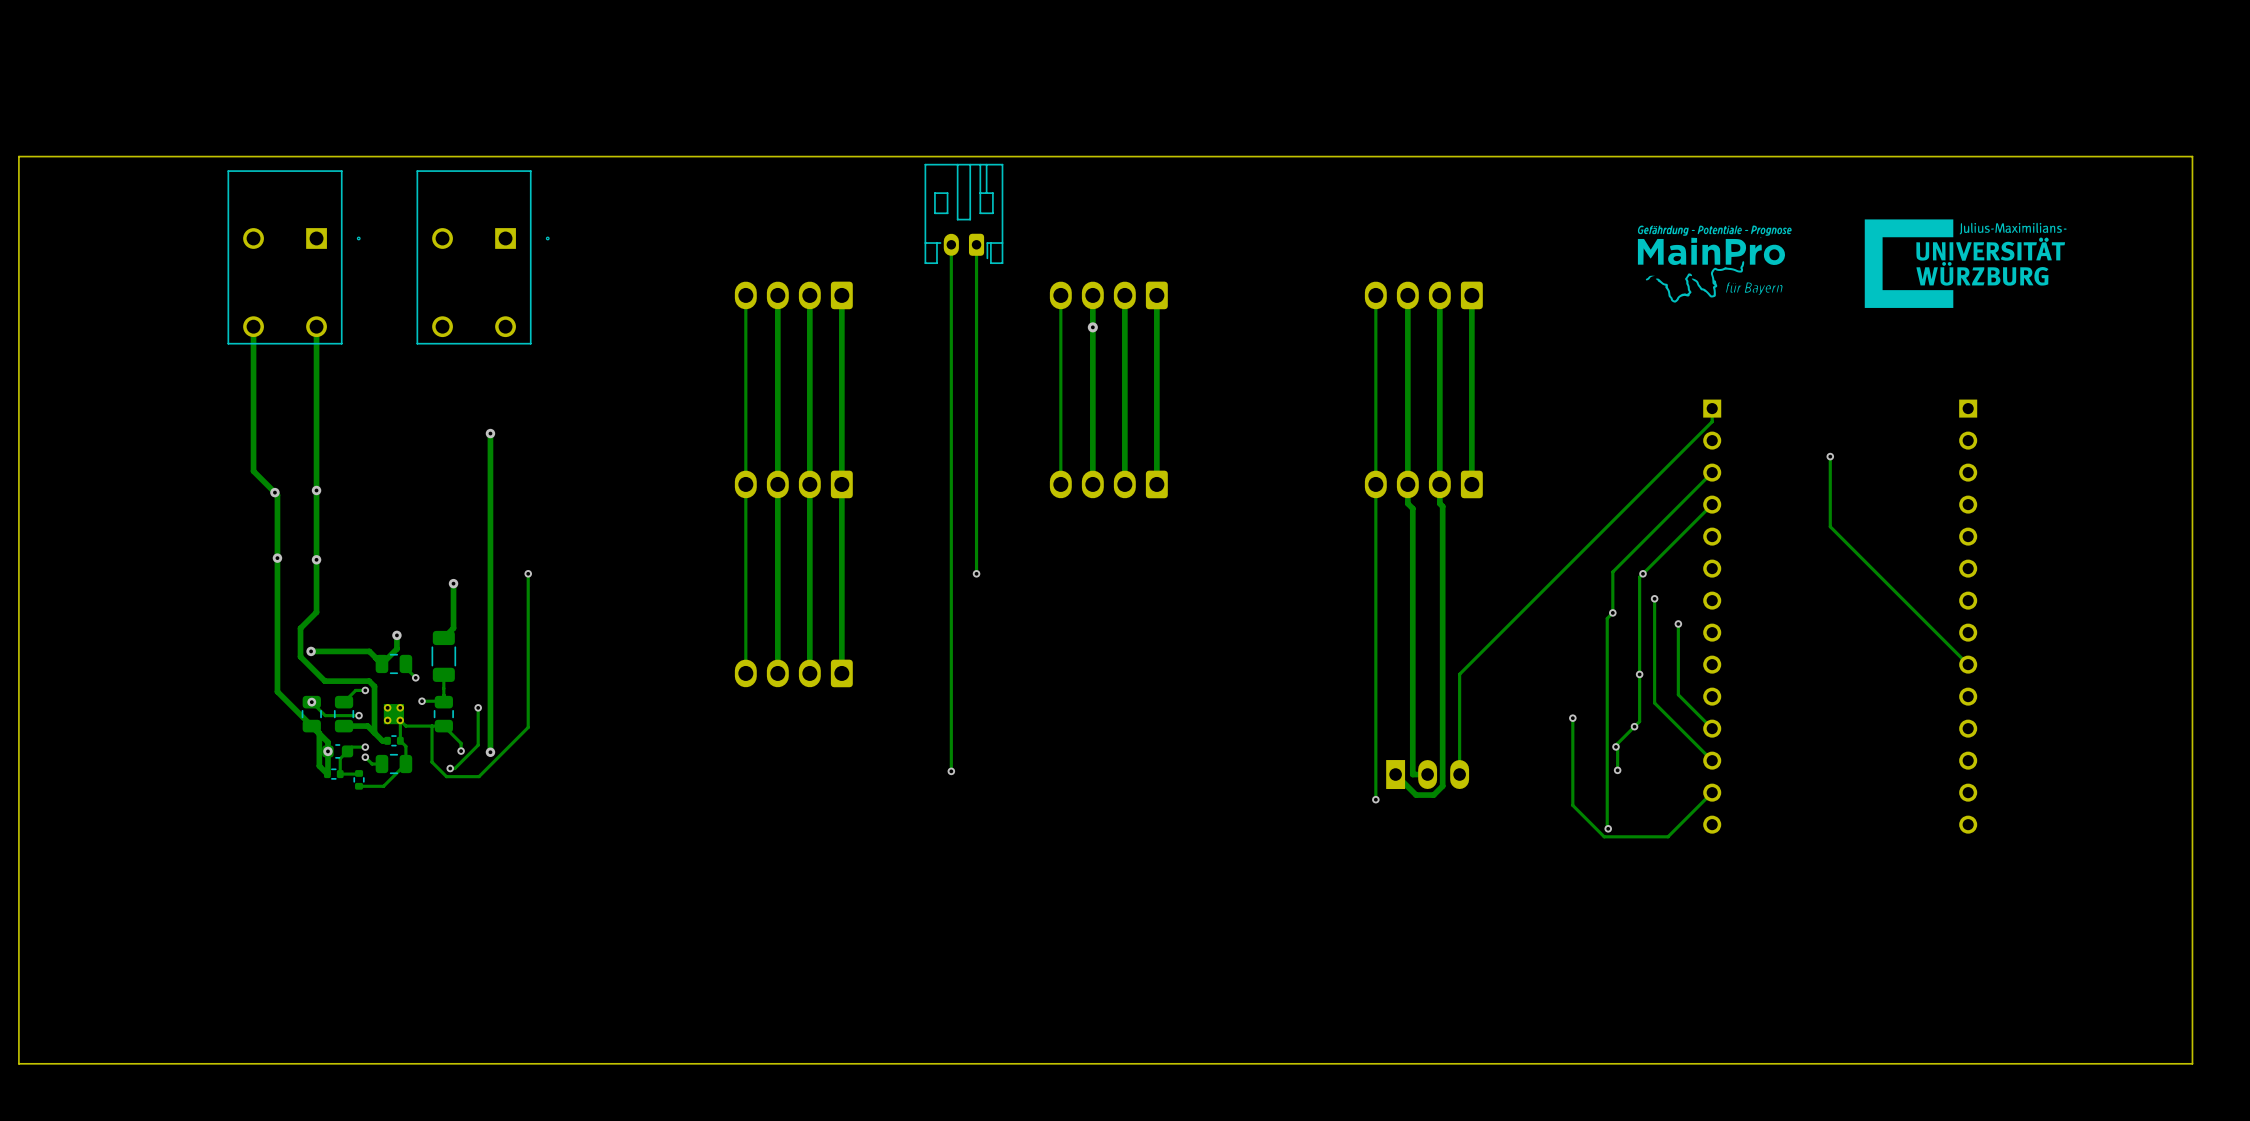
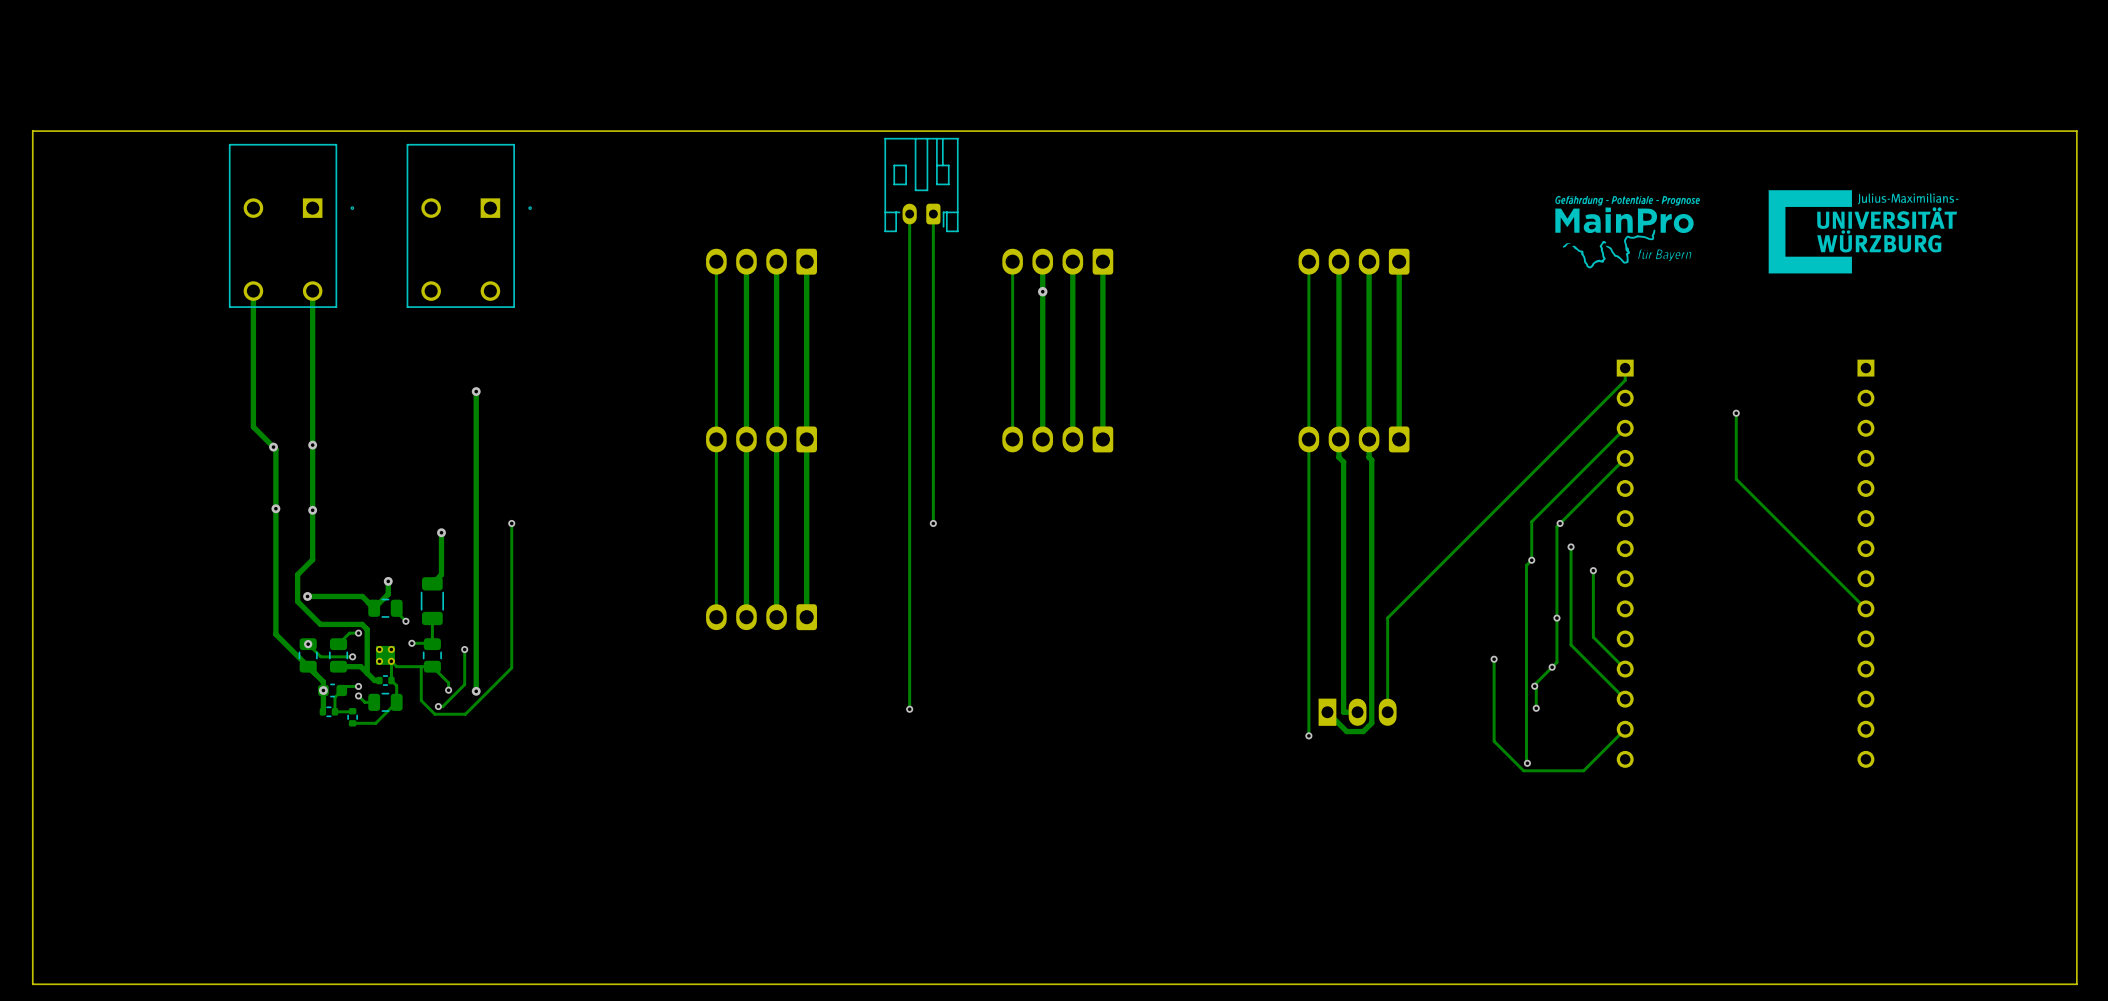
track: (319, 733) (319, 766) (327, 774) -> none

